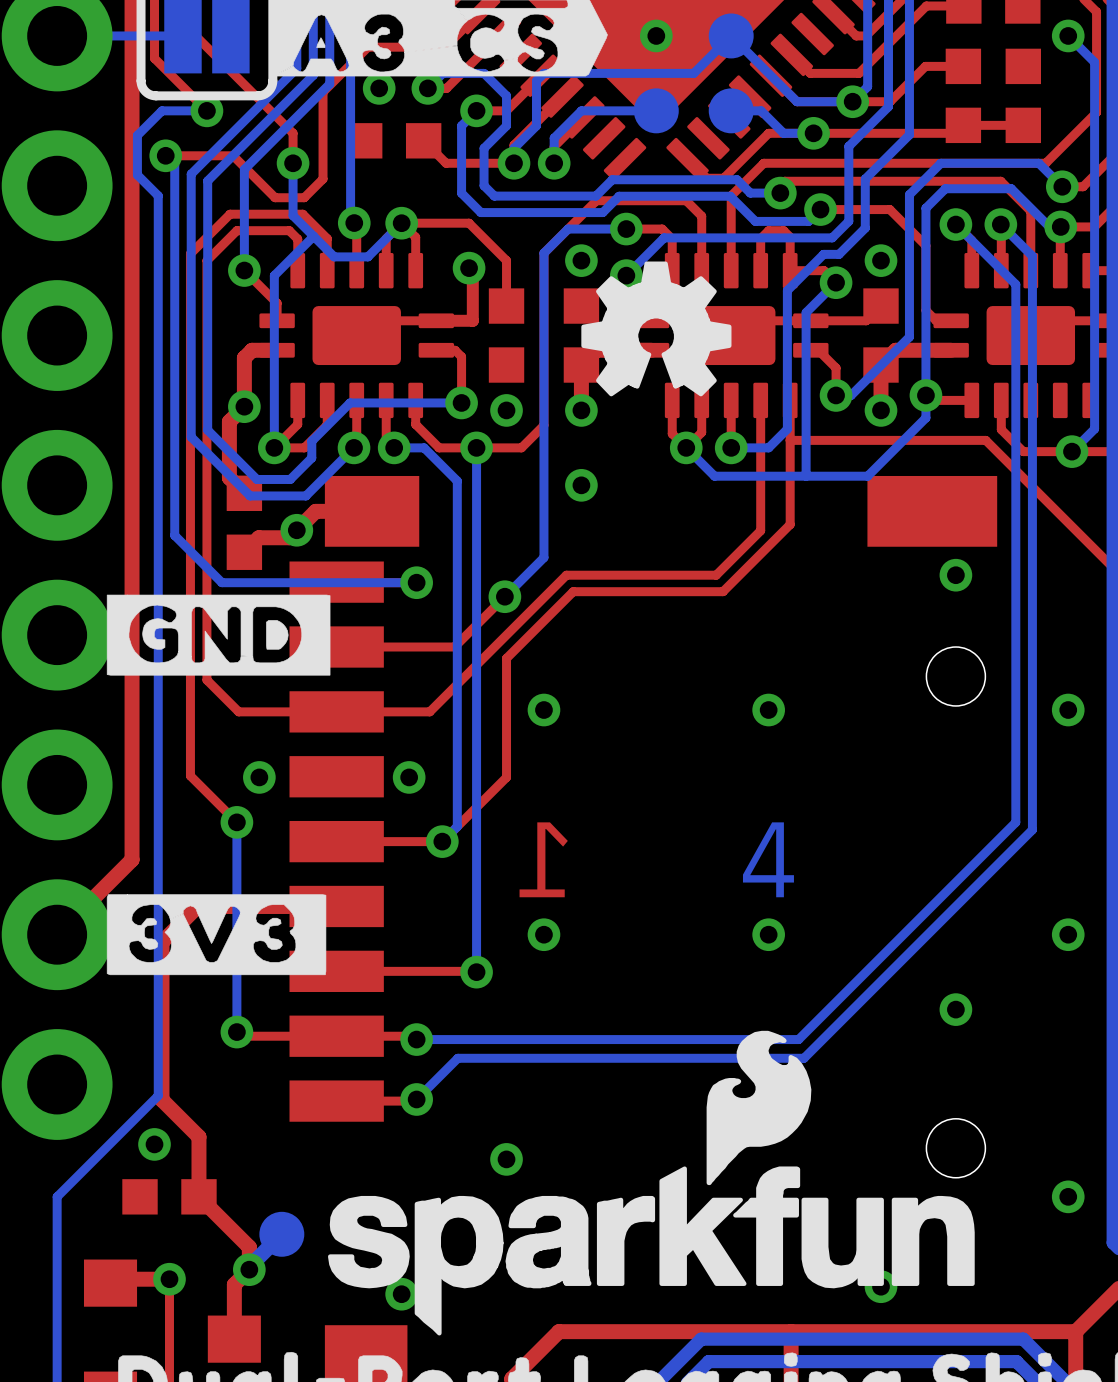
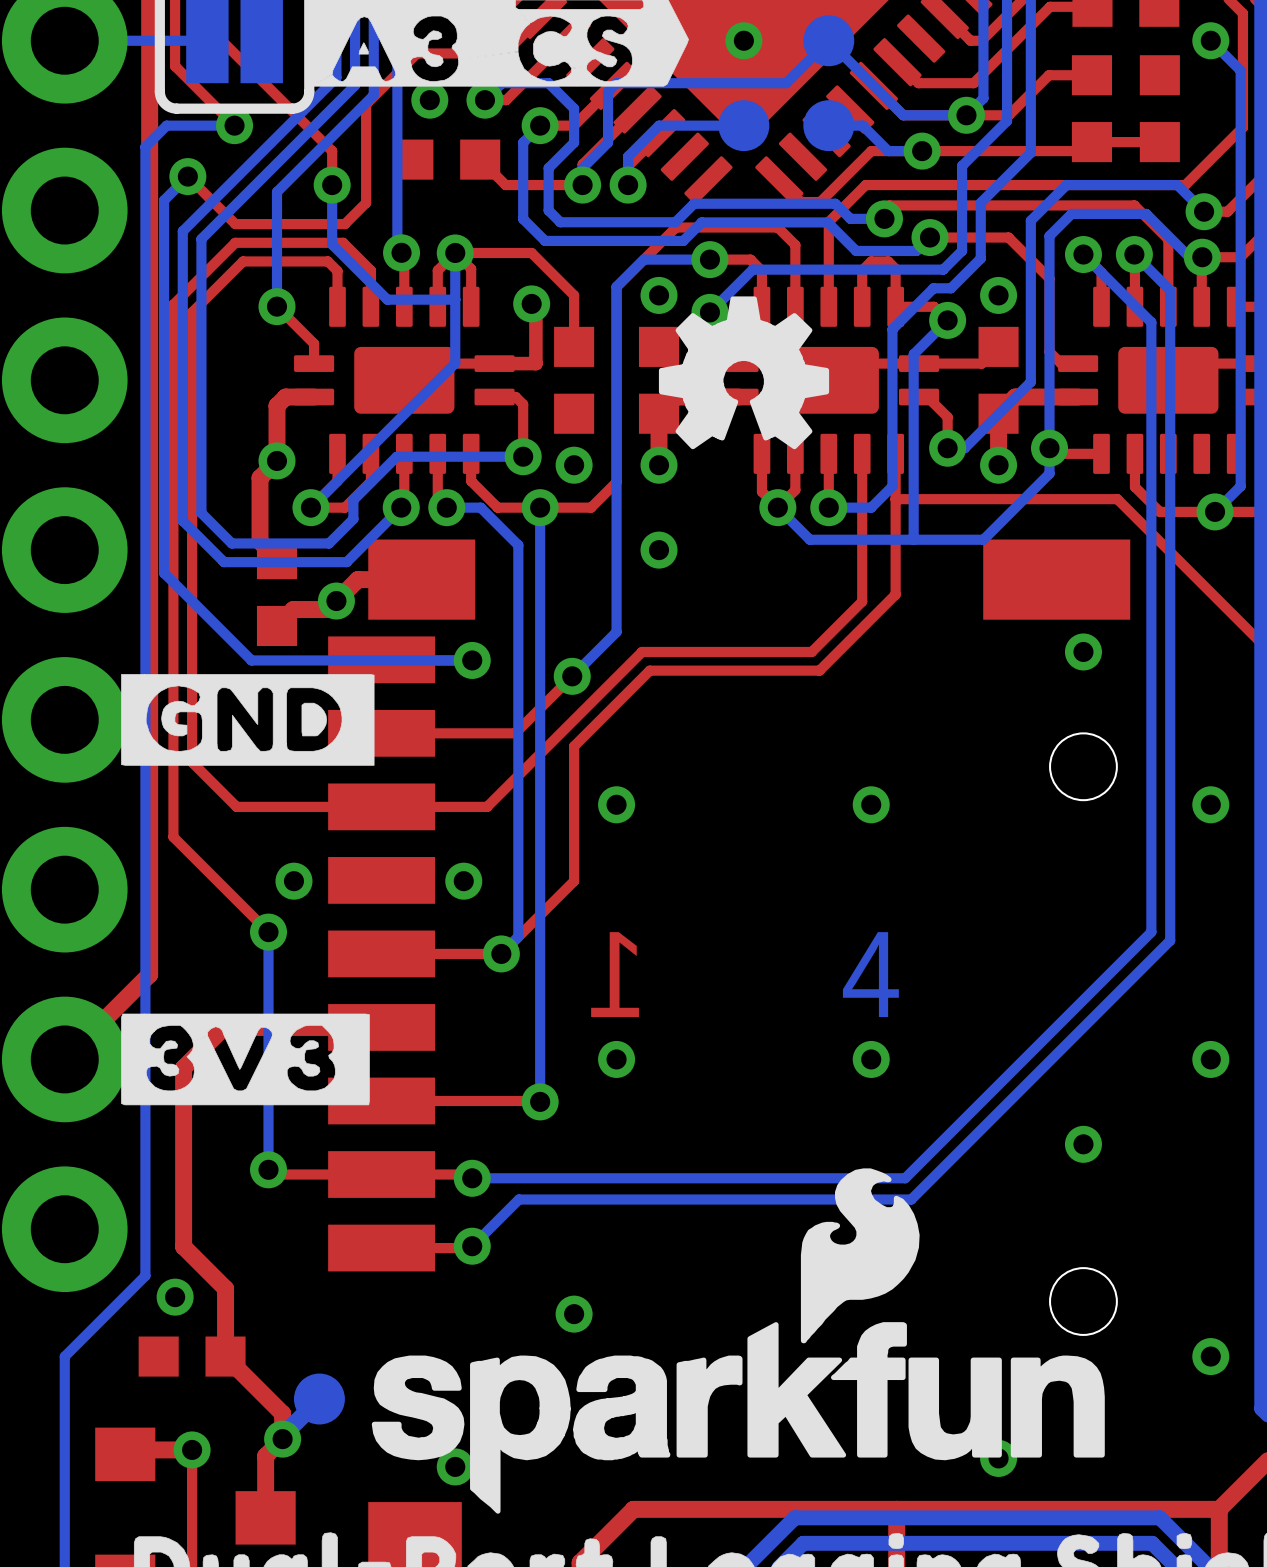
bottom track: (162, 110) (137, 135) (137, 175) (158, 195) (158, 1095) (128, 1125) -> (183, 125) (166, 125) (145, 146) (145, 1275)
top track: (165, 155) (233, 155) (275, 197) -> (187, 176) (235, 224) (311, 224)
bottom track: (165, 155) (174, 164) (174, 535) -> (187, 176) (164, 200) (164, 573) (198, 606)
bottom track: (191, 174) (191, 437) (250, 495) -> (216, 197) (182, 231) (182, 520) (224, 562) (283, 562)
bottom track: (207, 180) (207, 430) (256, 479) -> (235, 205) (201, 239) (201, 513) (231, 543) (291, 543)
top track: (230, 214) (190, 253) (190, 775) -> (260, 242) (235, 242) (173, 304) (173, 837) (215, 879)
bottom track: (401, 223) (367, 256) (334, 256) -> (455, 299) (387, 299) (378, 291)
top track: (236, 230) (206, 260) (206, 680) (238, 711) -> (268, 261) (243, 261) (192, 312) (192, 762) (236, 806) (270, 806)
bottom track: (313, 236) (274, 275) (274, 447) -> (455, 252) (455, 363) (310, 507)

